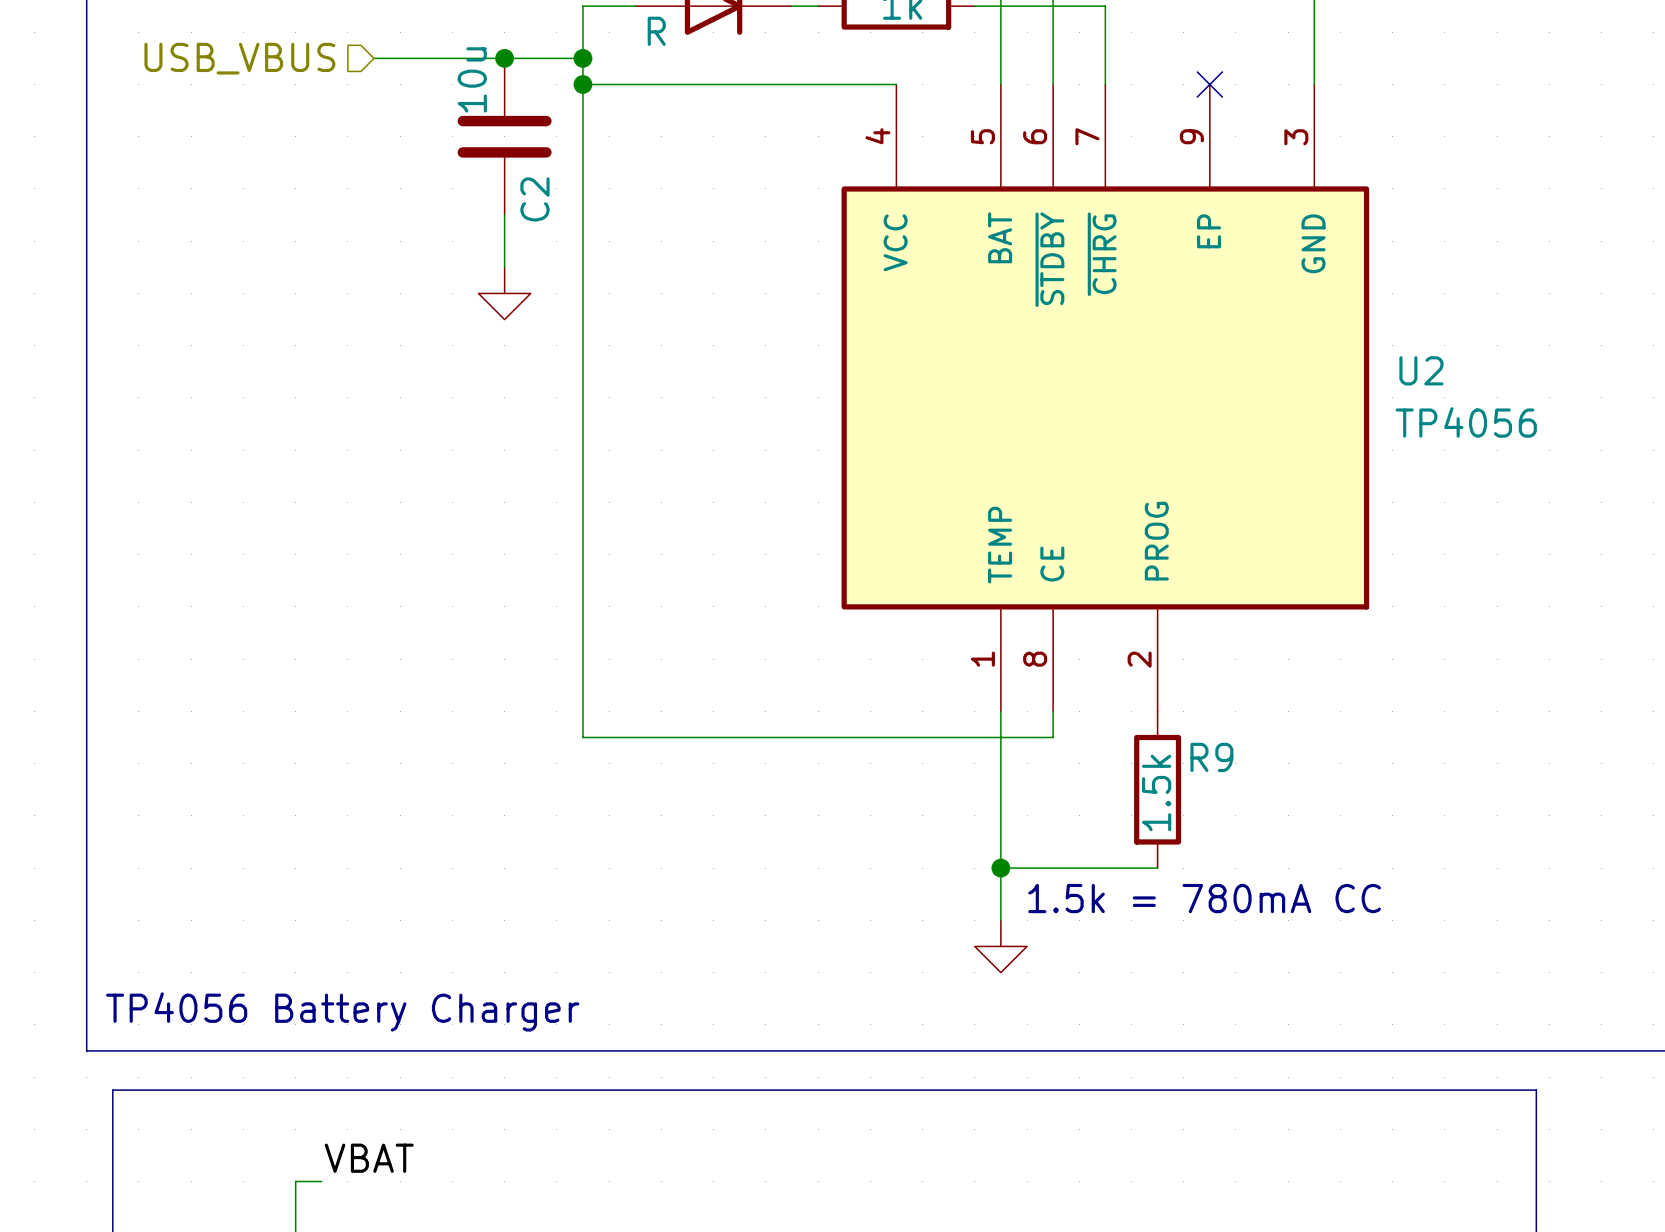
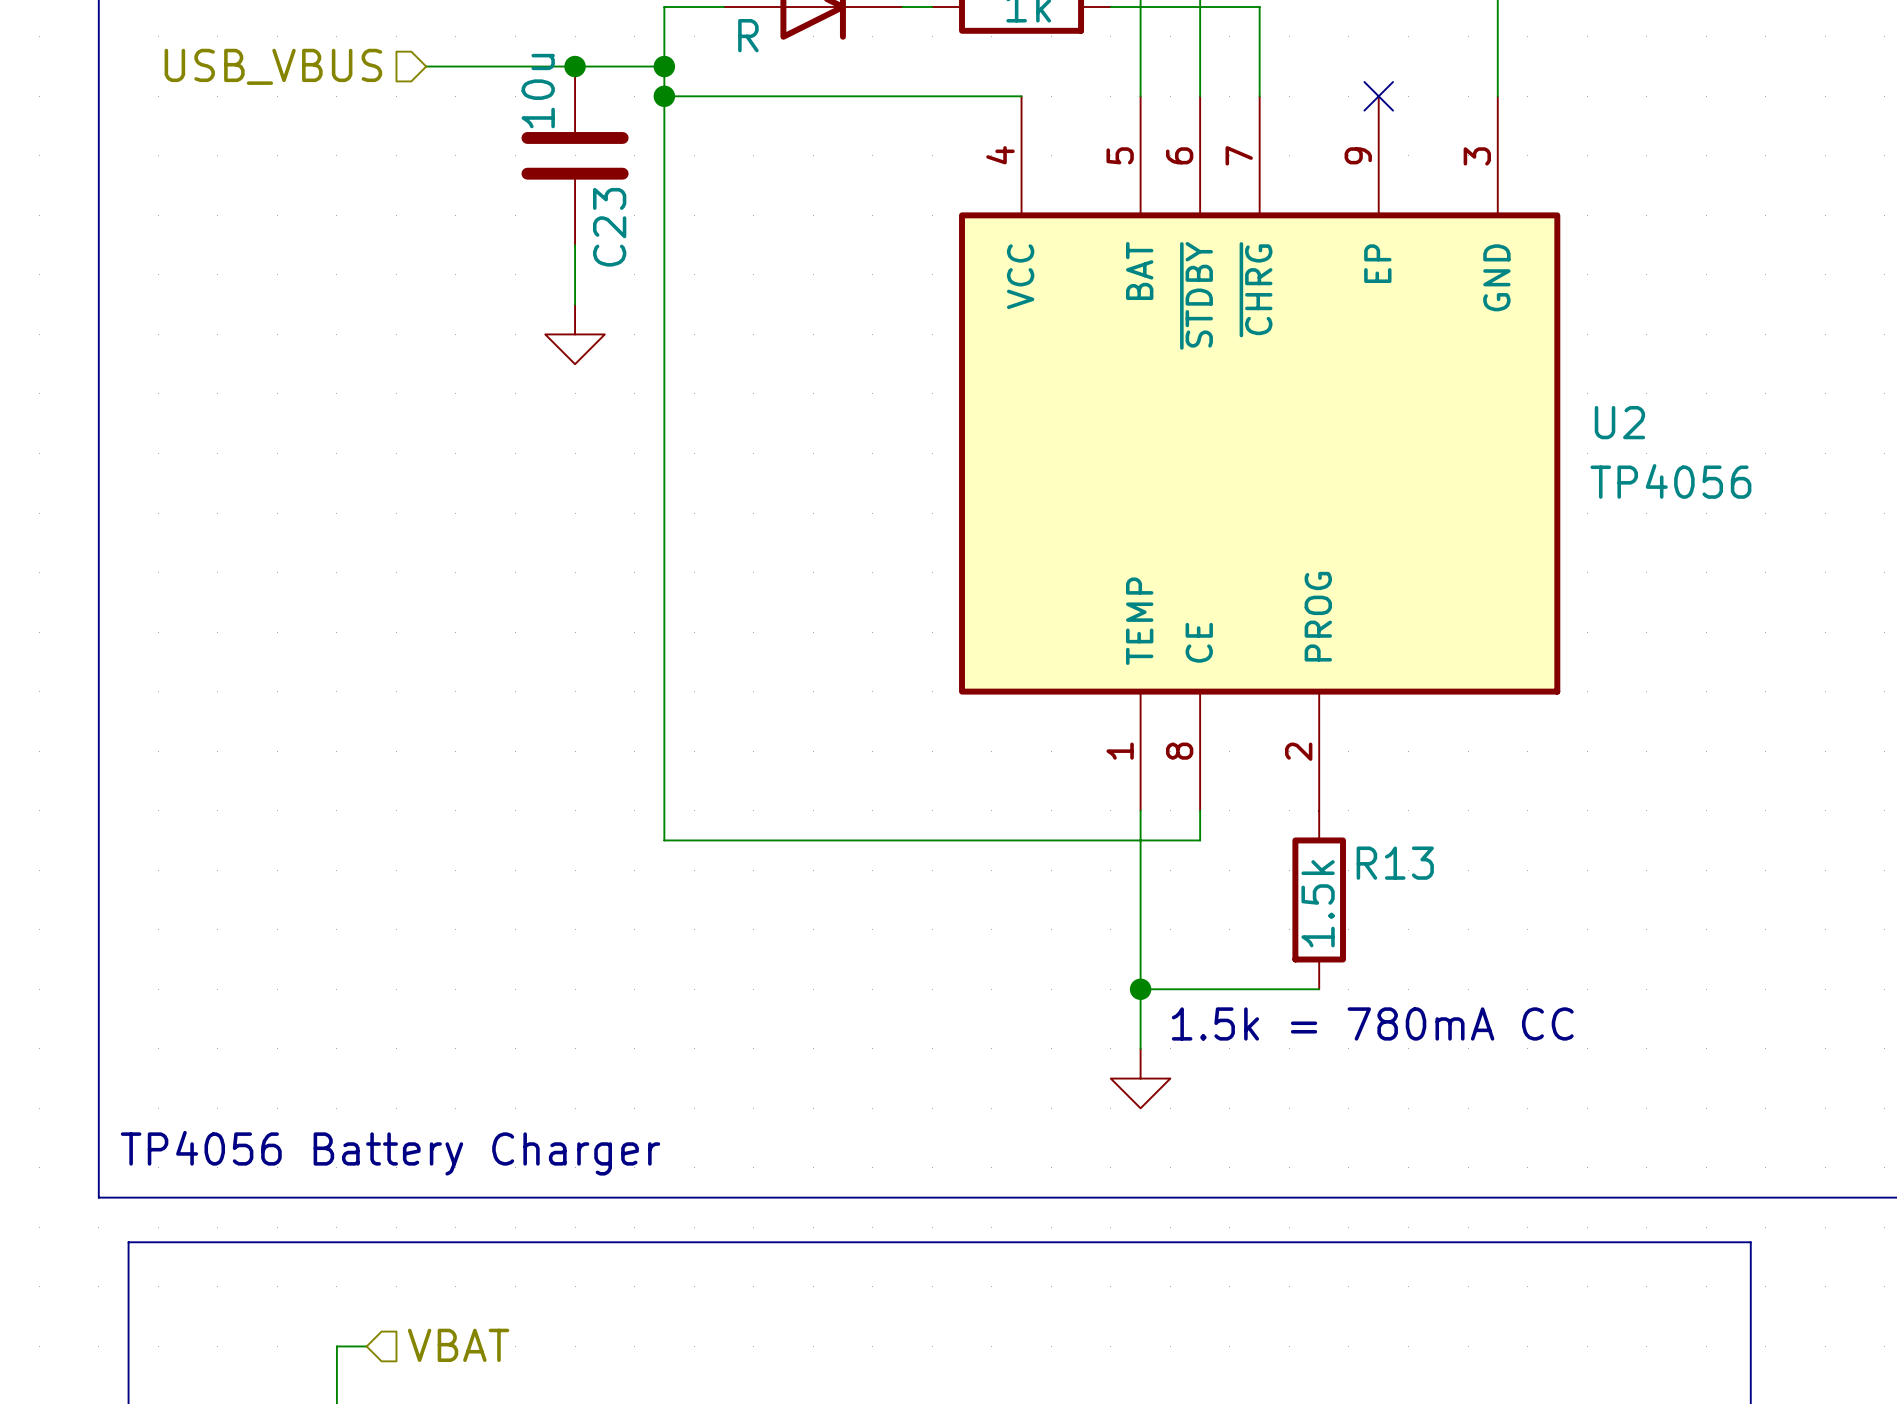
C2 name: C2 (534, 199) -> C23 (609, 227)
R9 name: R9 (1211, 757) -> R13 (1395, 863)
label: VBAT (369, 1158) -> none
hierarchical label: none -> VBAT (458, 1345)

